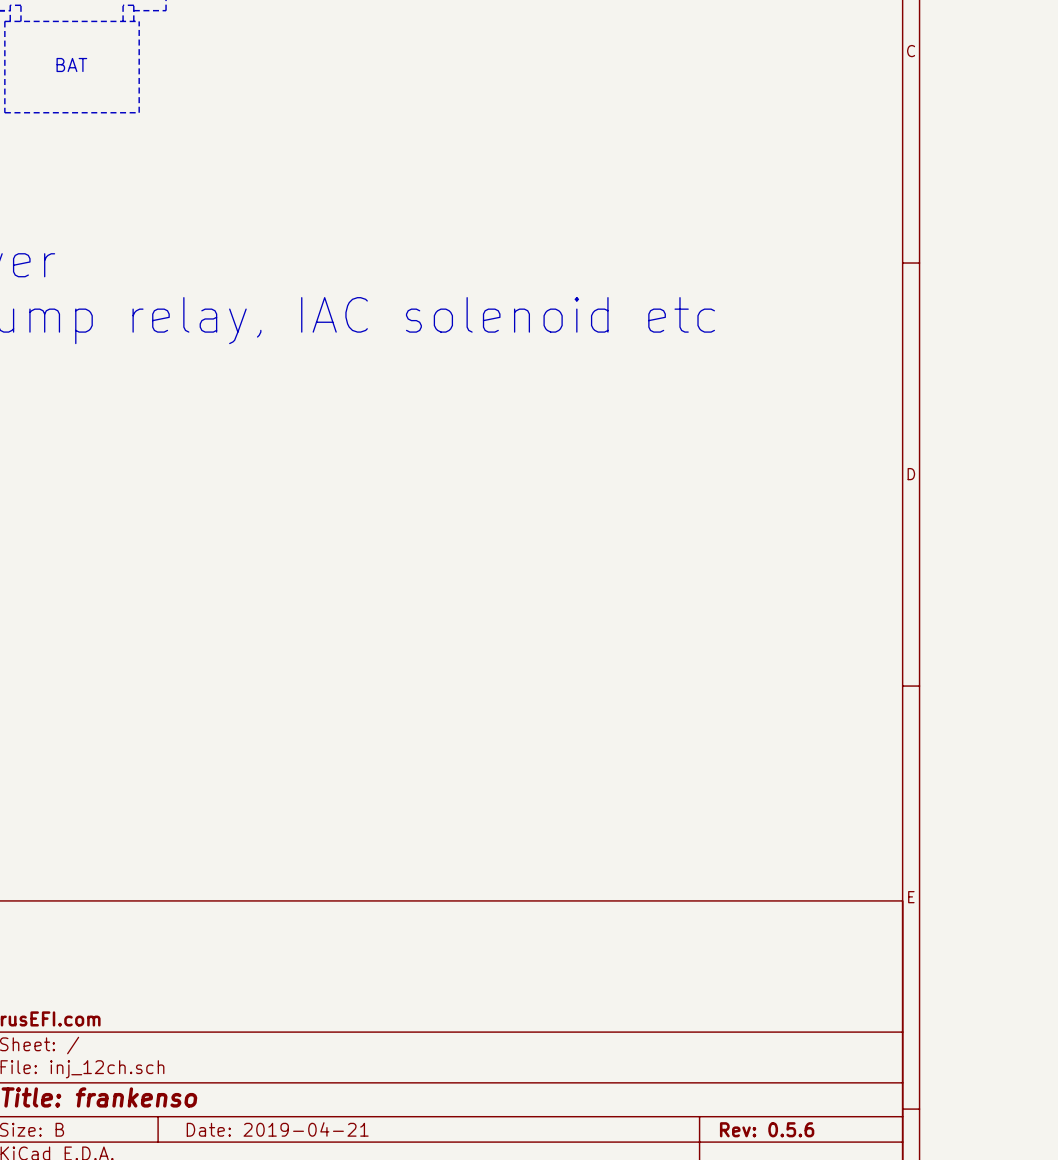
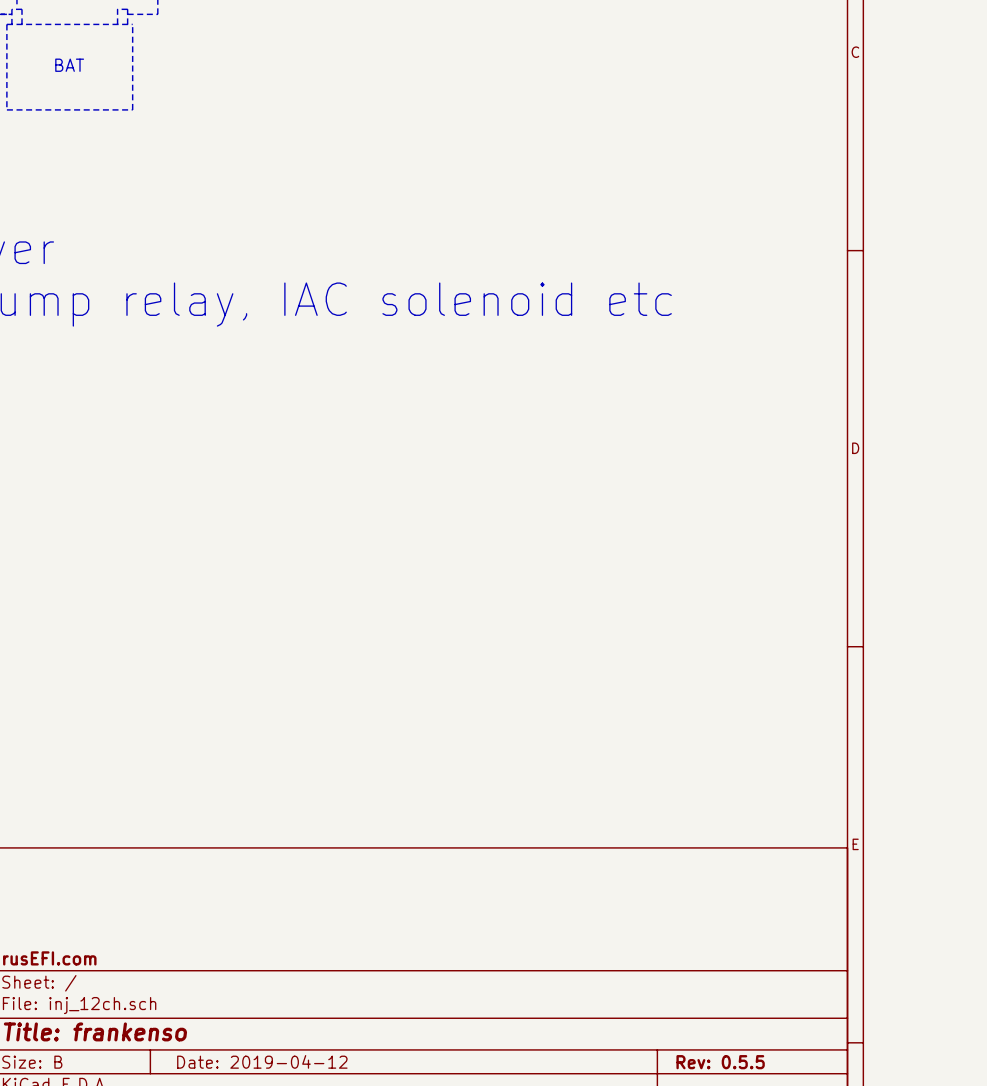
title block: Date: 2019-04-21 (277, 1129) -> Date: 2019-04-12 (262, 1061)
title block: Rev: 0.5.6 (767, 1129) -> Rev: 0.5.5 (720, 1062)

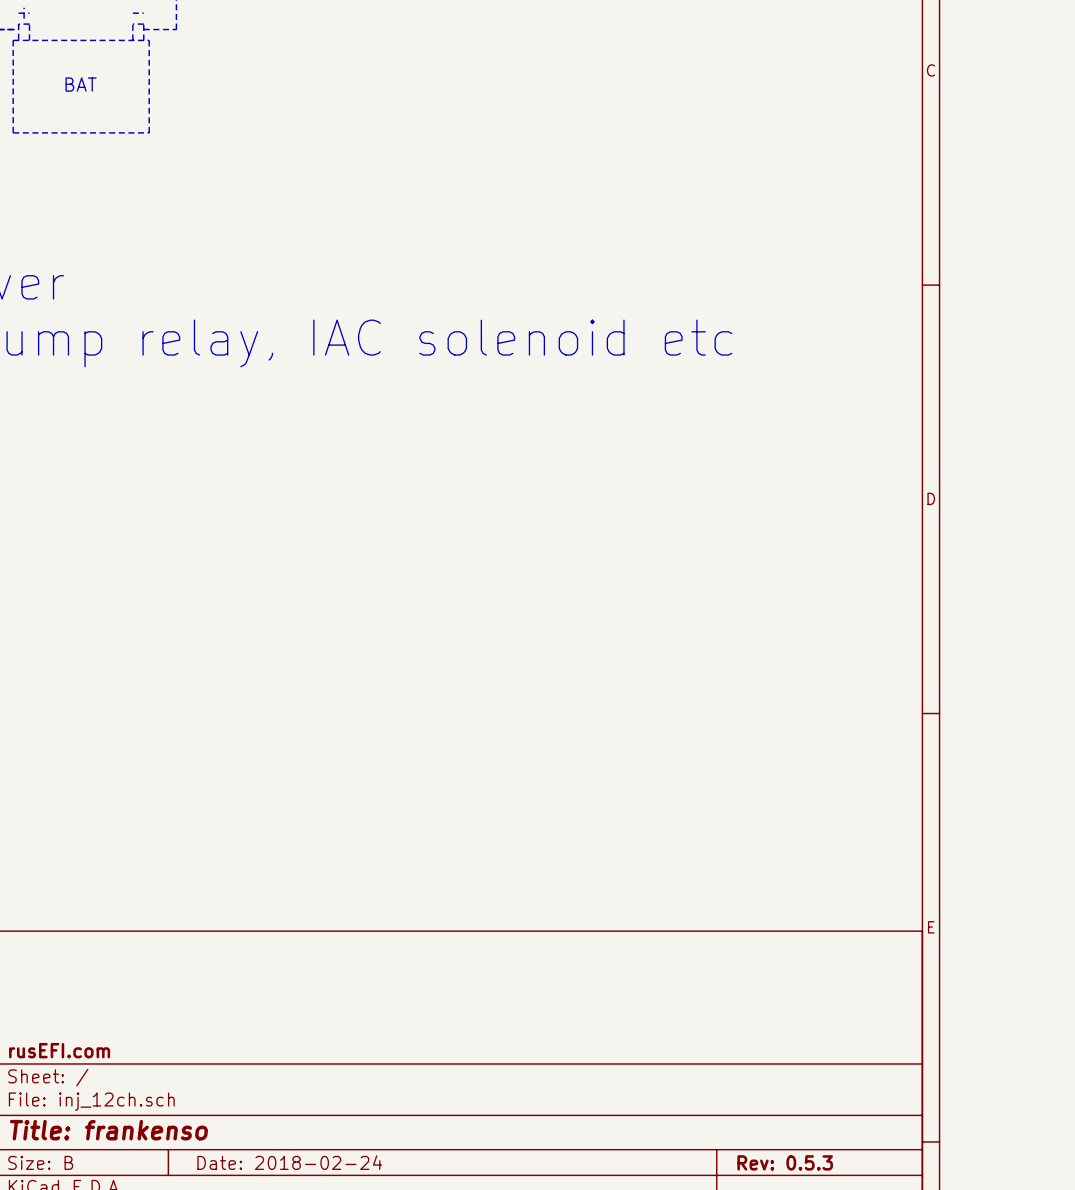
title block: Date: 2019-04-12 (262, 1061) -> Date: 2018-02-24 (289, 1162)
title block: Rev: 0.5.5 (720, 1062) -> Rev: 0.5.3 (785, 1162)

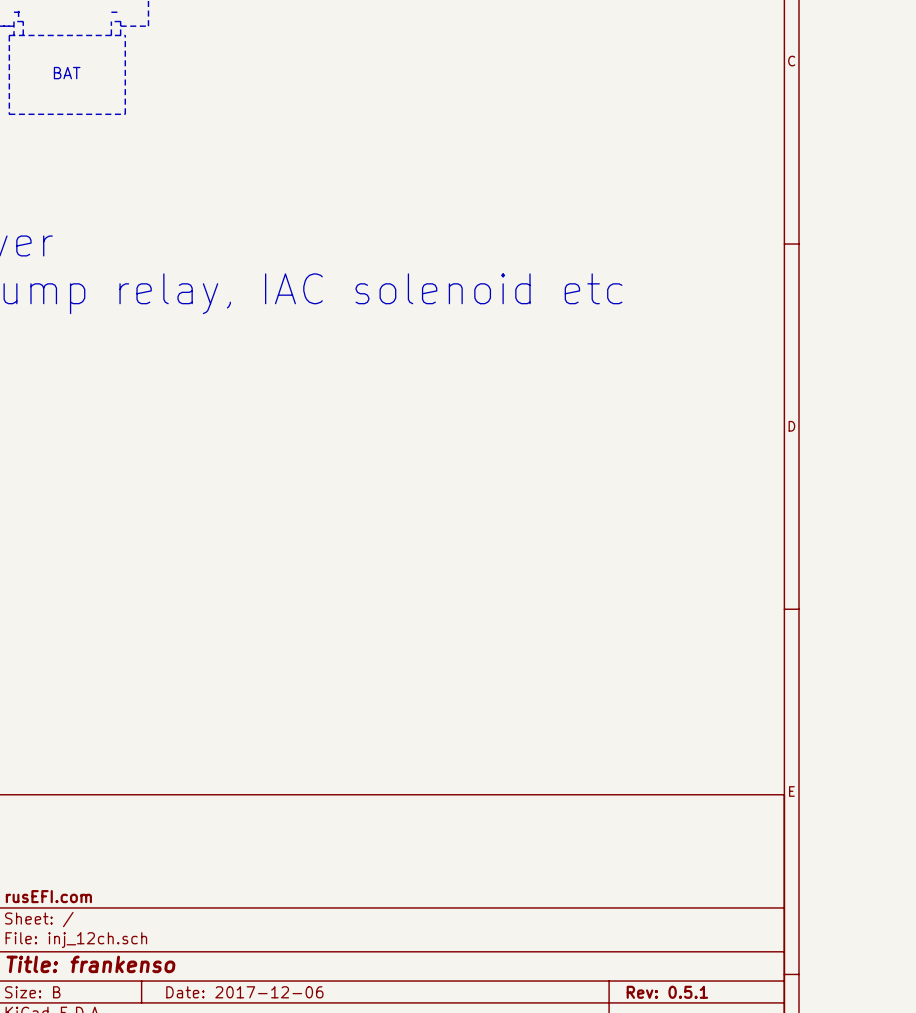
title block: Date: 2018-02-24 (289, 1162) -> Date: 2017-12-06 (244, 992)
title block: Rev: 0.5.3 (785, 1162) -> Rev: 0.5.1 (667, 992)

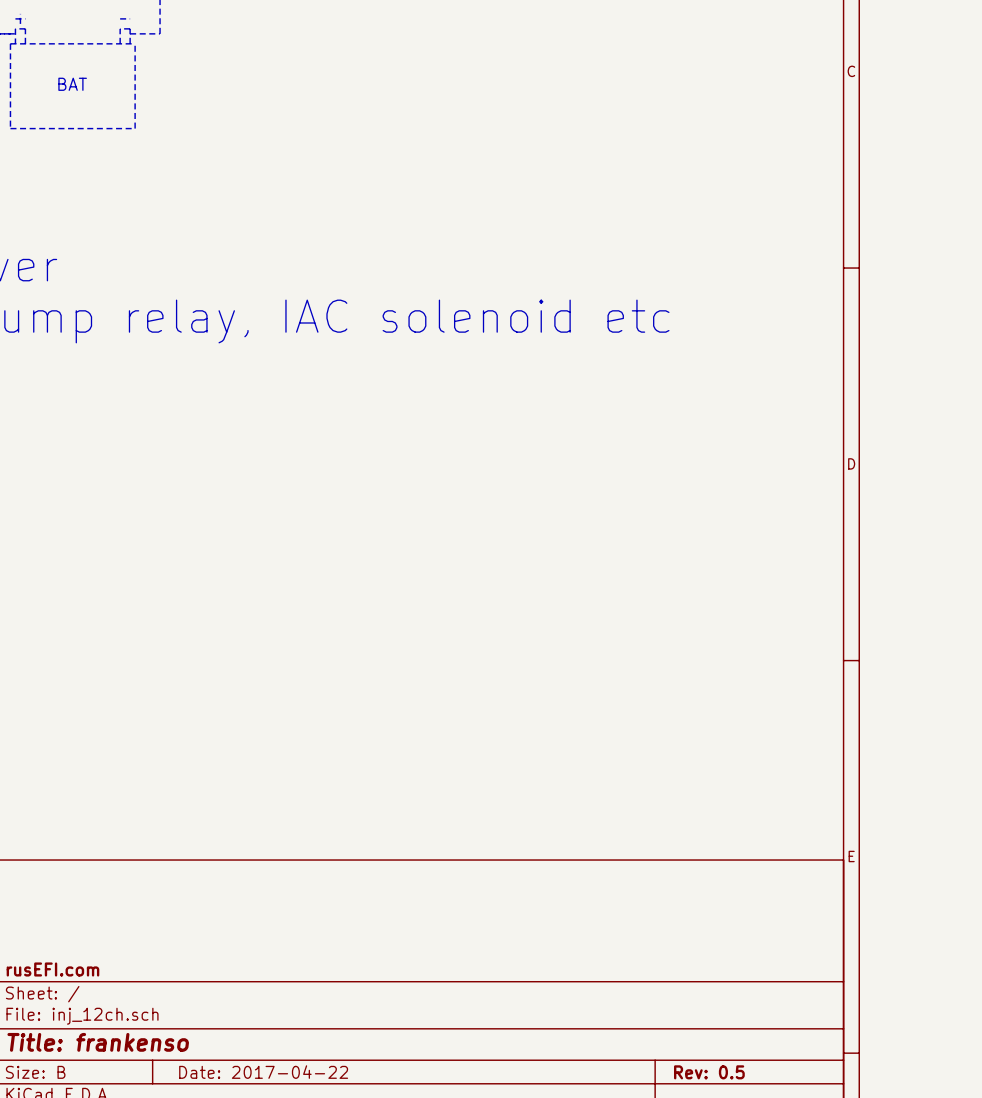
title block: Date: 2017-12-06 (244, 992) -> Date: 2017-04-22 (263, 1072)
title block: Rev: 0.5.1 (667, 992) -> Rev: 0.5 (709, 1072)

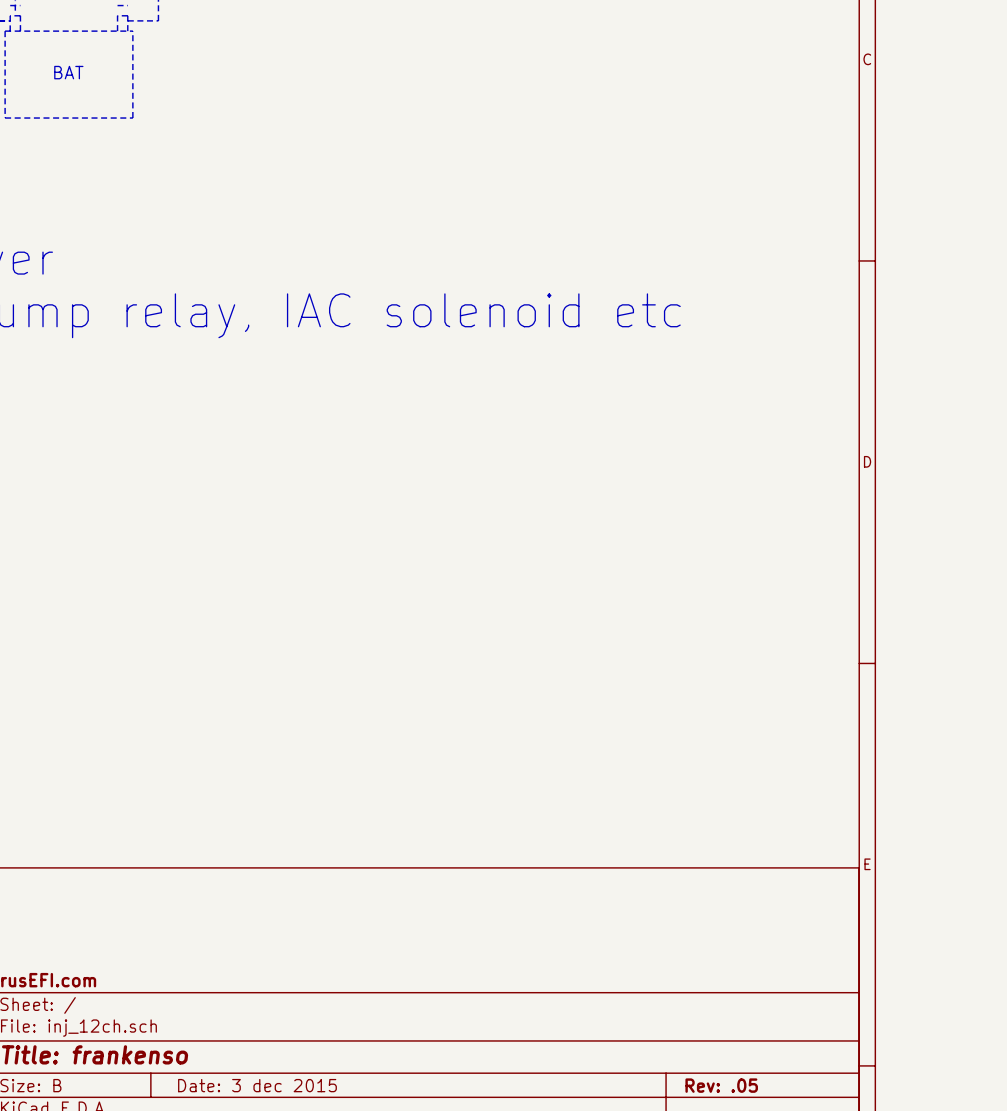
title block: Date: 2017-04-22 (263, 1072) -> Date: 3 dec 2015 (257, 1085)
title block: Rev: 0.5 (709, 1072) -> Rev: .05 (721, 1085)

